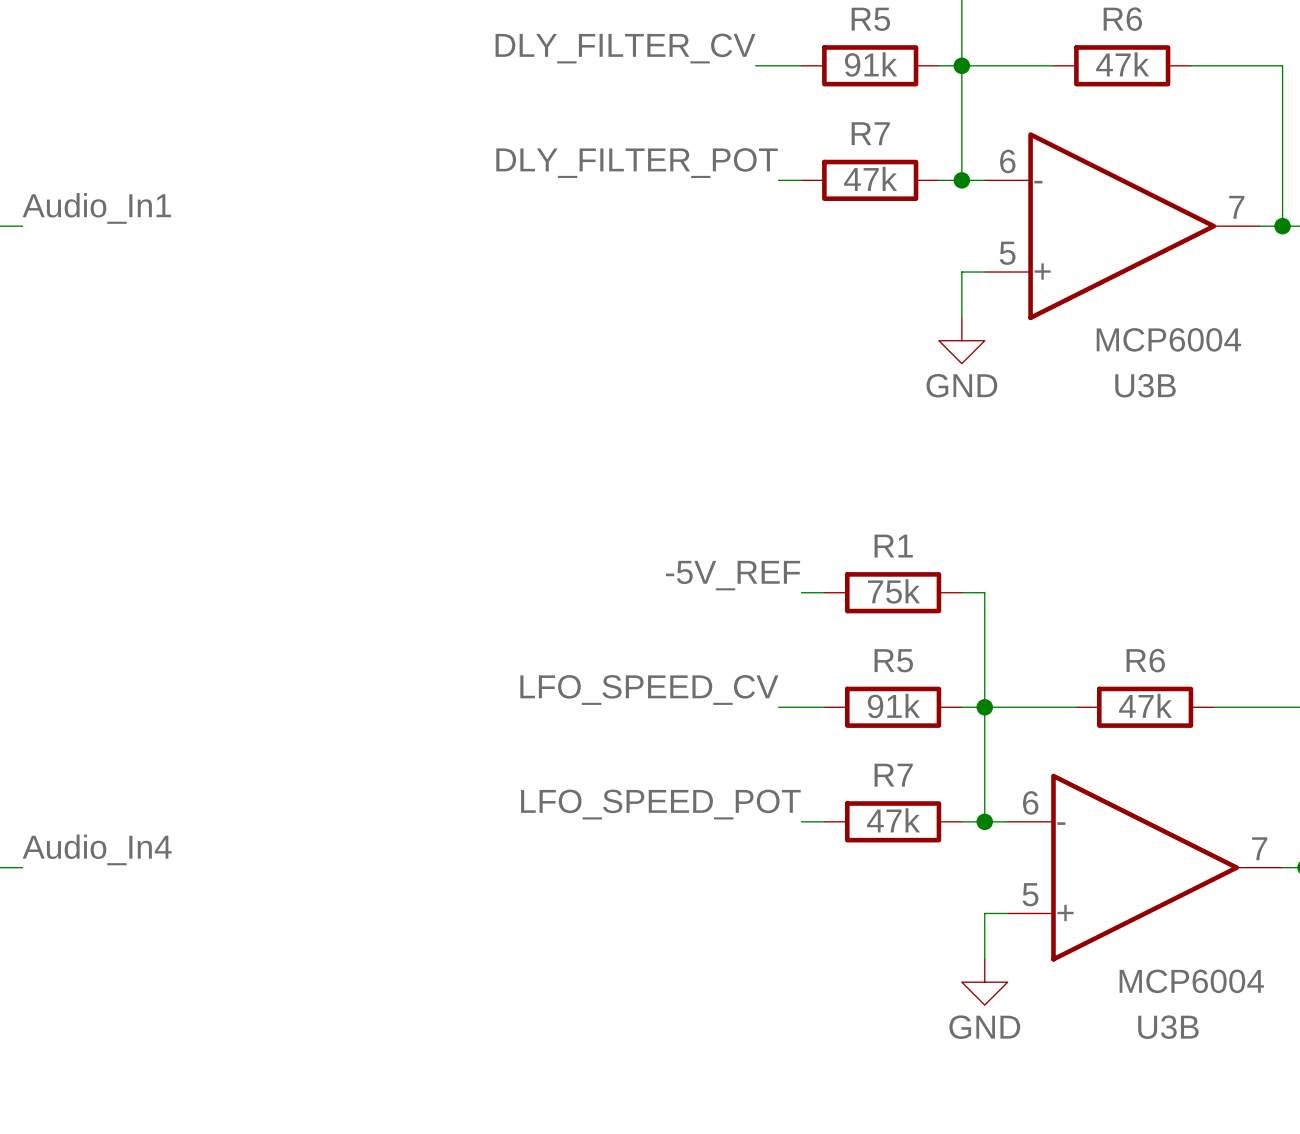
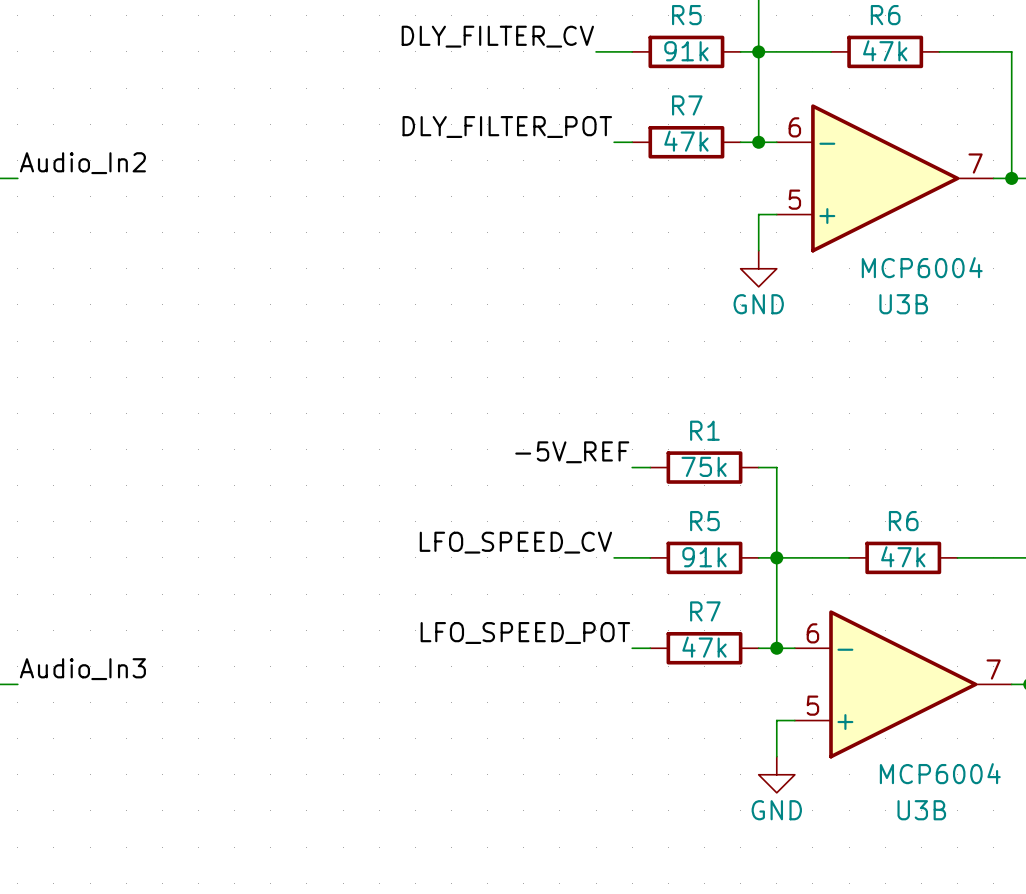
label: Audio_In1 (96, 208) -> Audio_In2 (82, 163)
label: Audio_In4 (97, 849) -> Audio_In3 (82, 669)

